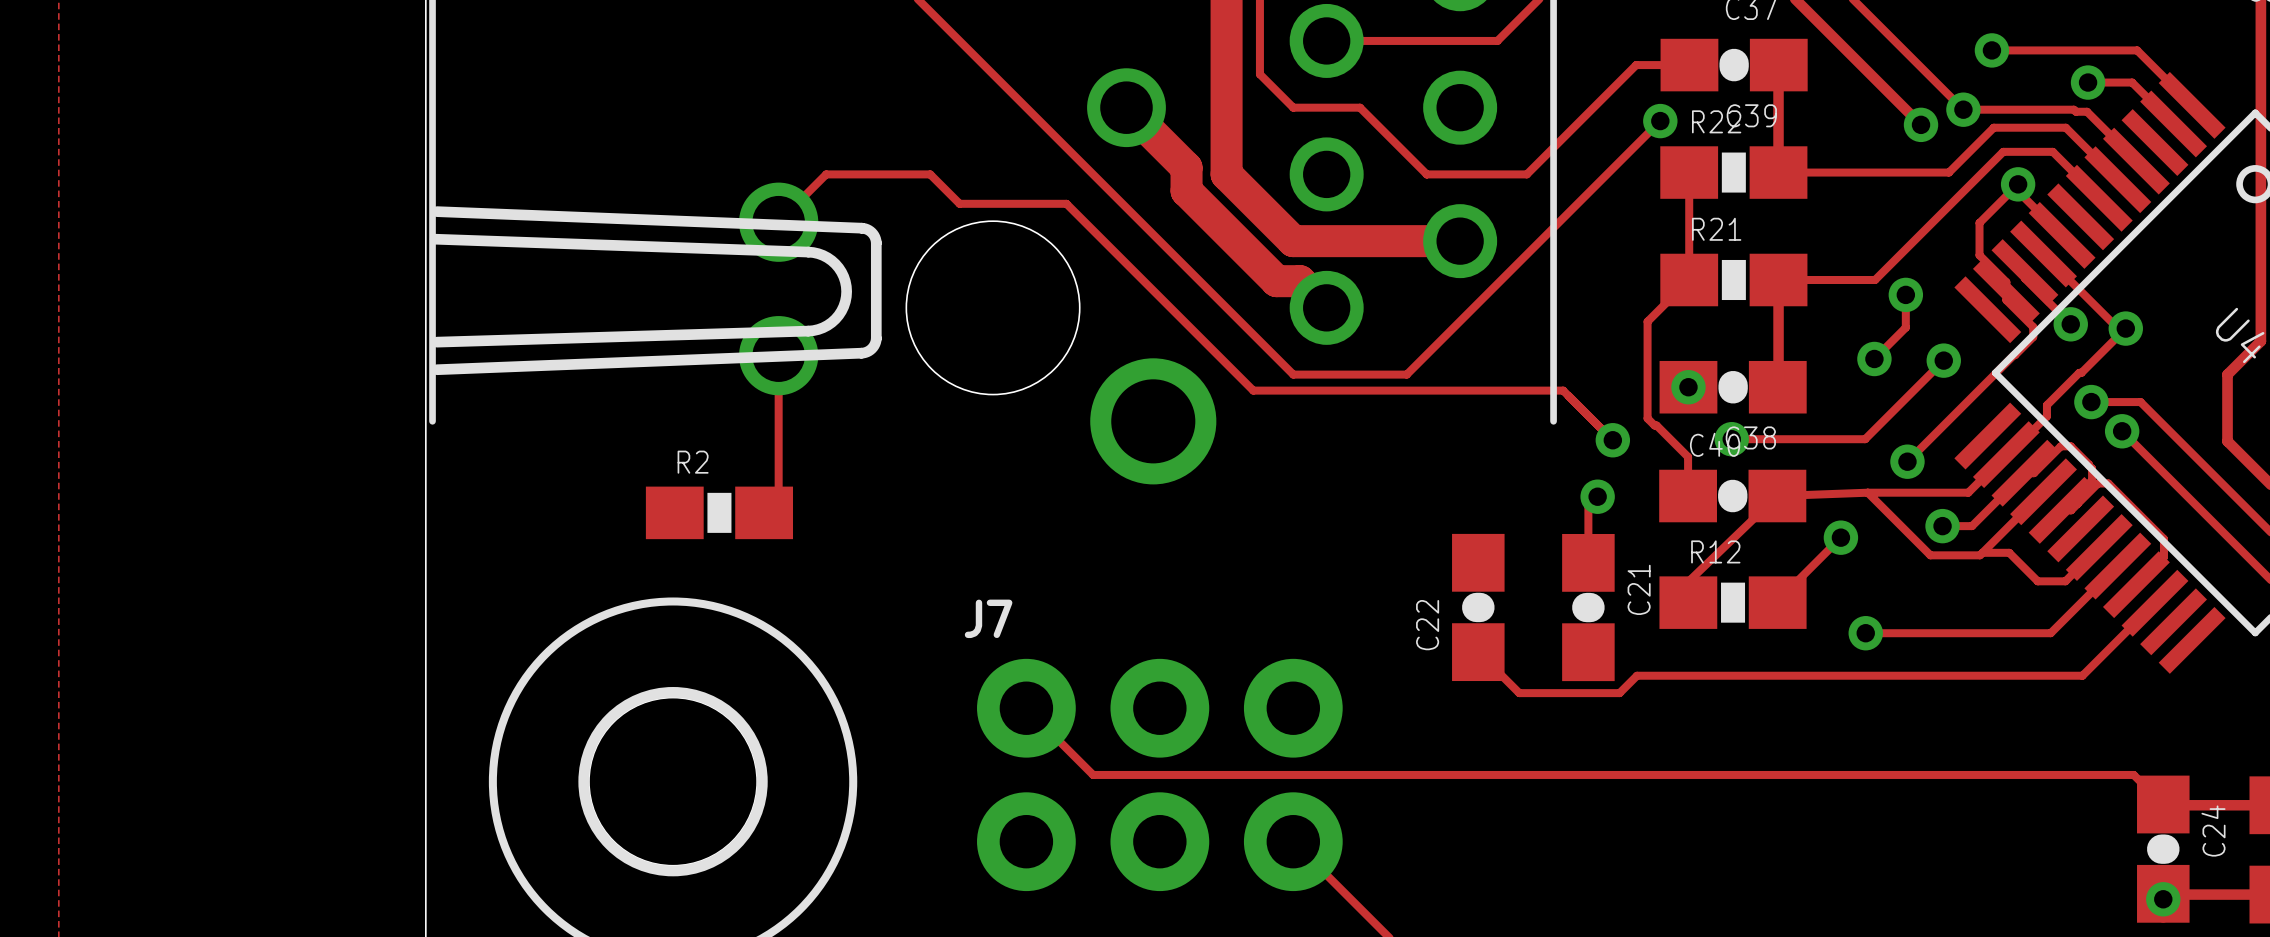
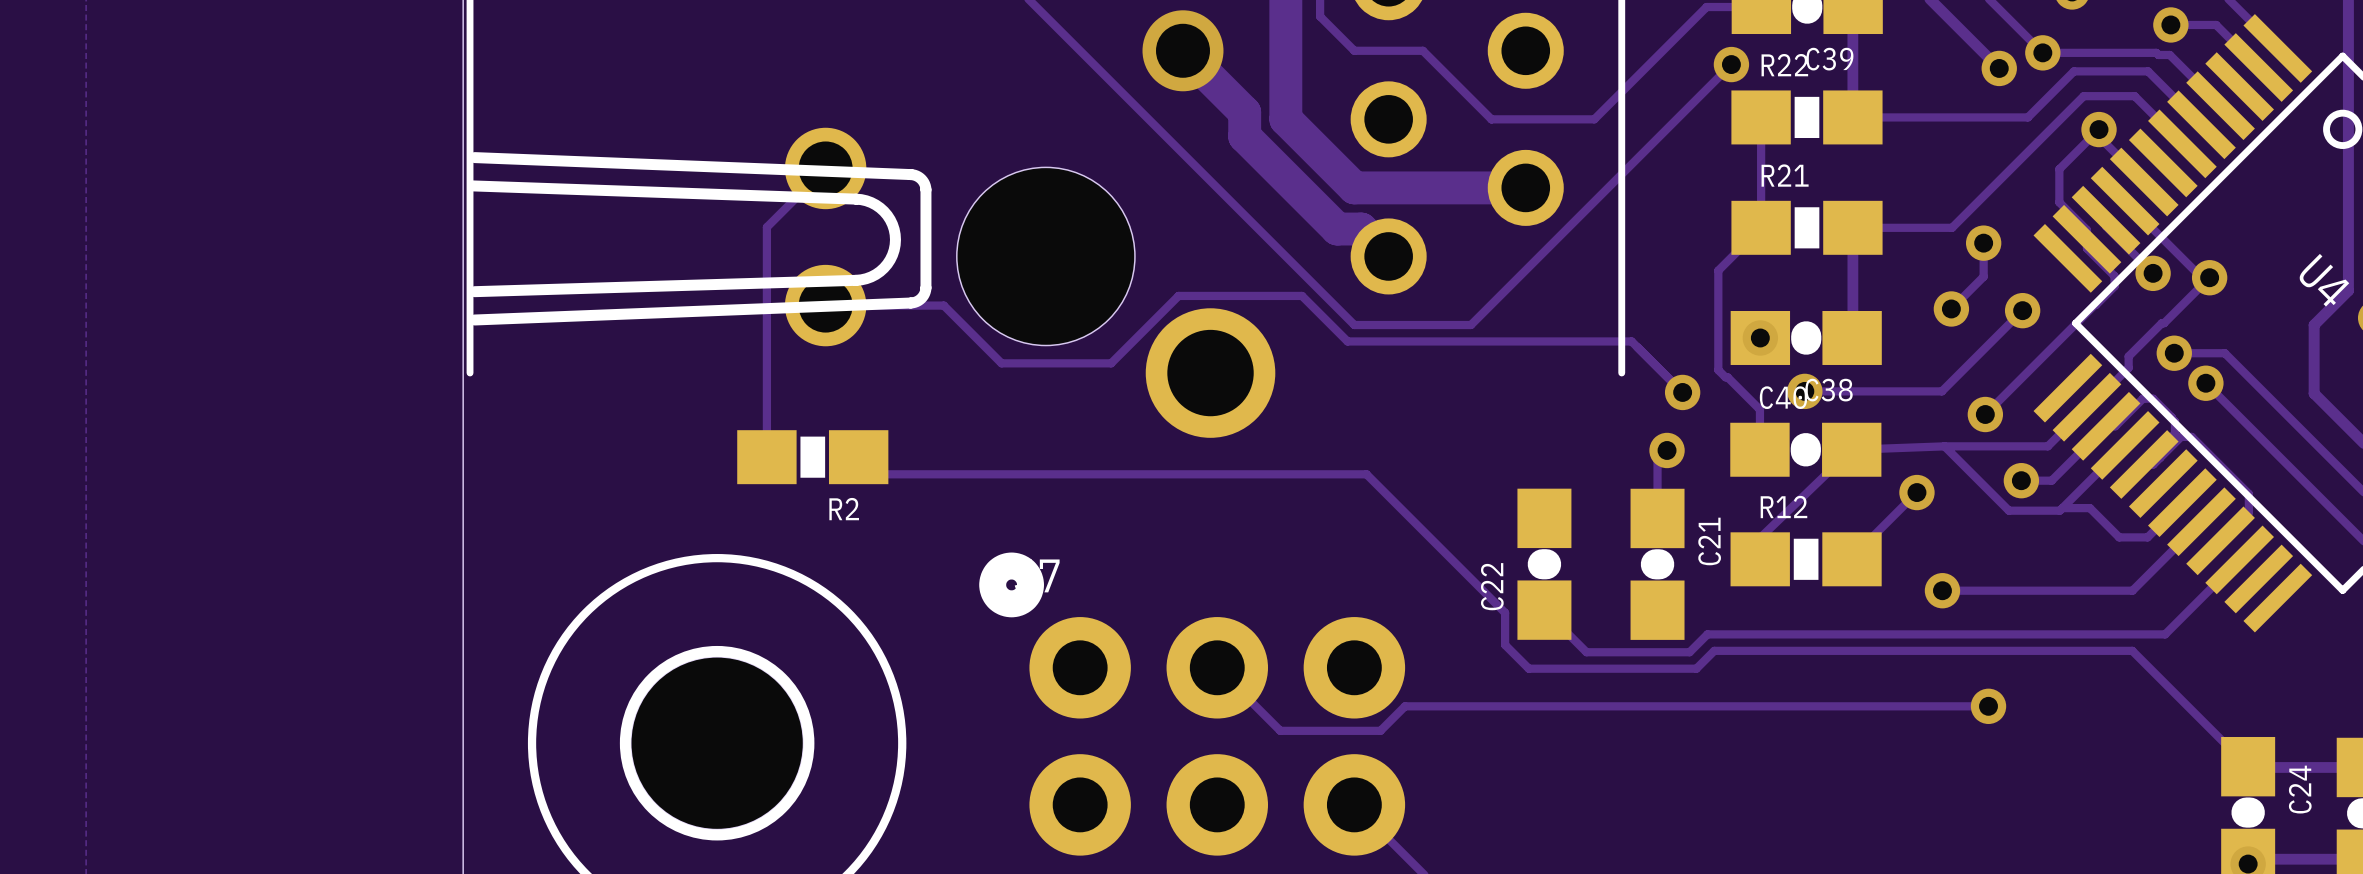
track: (778, 221) (826, 174) (930, 174) (959, 203) (1066, 203) (1253, 390) (1286, 390) -> (825, 305) (943, 305) (1001, 363) (1111, 363) (1178, 295) (1302, 295) (1347, 341)
track: none -> (825, 168) (766, 227) (766, 457)
track: (778, 355) (778, 531) (764, 512) -> none
R2 name position: R2 (693, 462) -> R2 (844, 509)
R2 position: (719, 512) -> (812, 457)
drawing: none -> [979, 552, 1044, 618]
track: (1026, 708) (1093, 774) (2133, 774) -> (858, 457) (875, 474) (1366, 474) (1505, 612) (1505, 644) (1528, 668) (1696, 668) (1714, 650) (2132, 650) (2217, 736)
track: none -> (1217, 667) (1280, 730) (1380, 730) (1405, 706) (1988, 706)
via: none -> (1988, 706)

